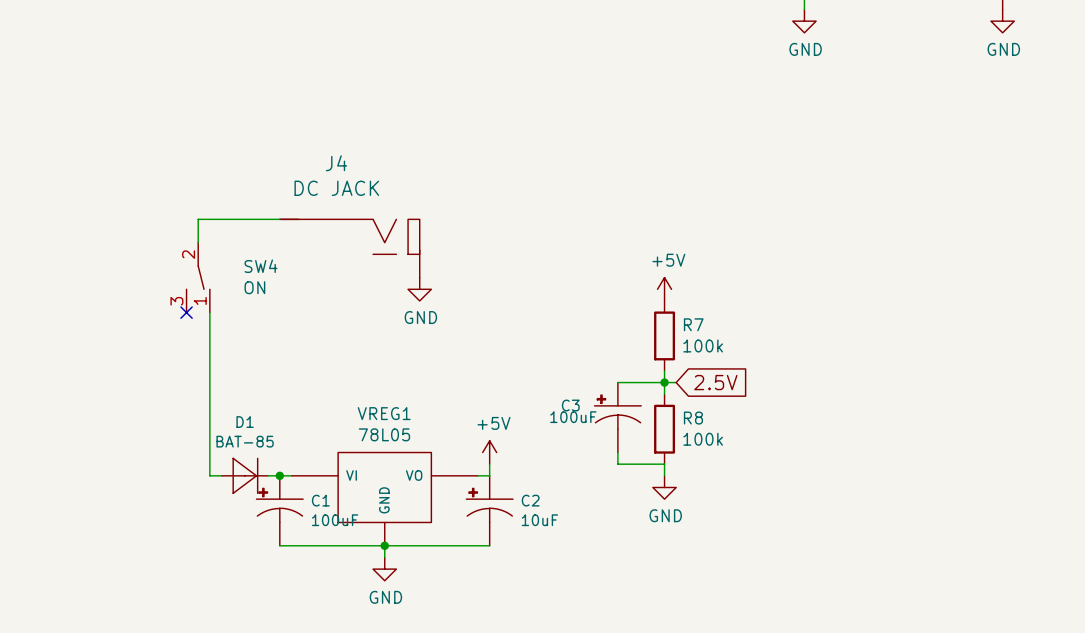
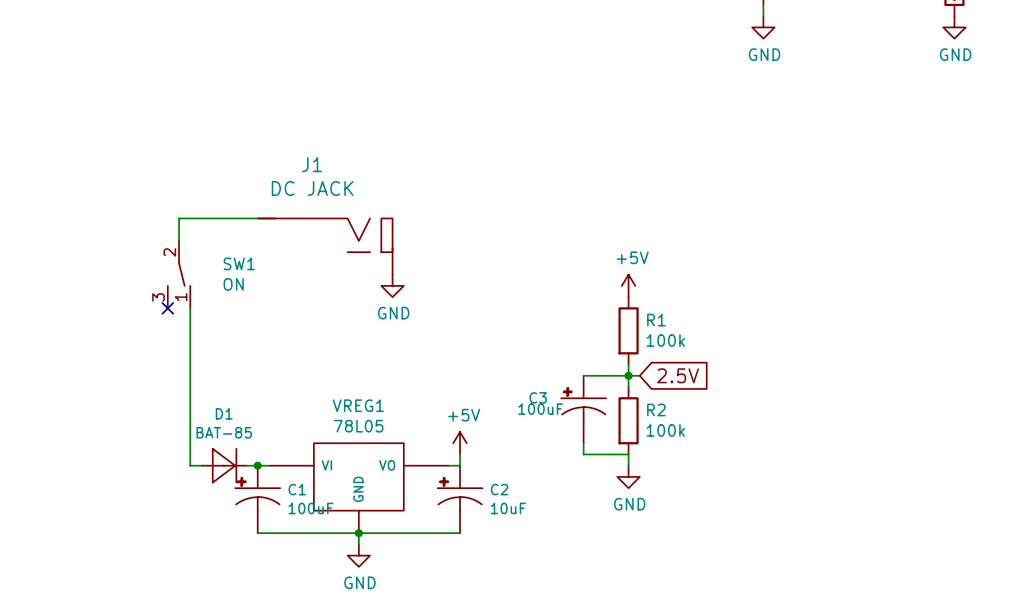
J4 name: J4 (336, 163) -> J1 (312, 164)
SW4 name: SW4 (261, 266) -> SW1 (239, 263)
R7 name: R7 (693, 324) -> R1 (656, 320)
R8 name: R8 (693, 418) -> R2 (656, 409)

